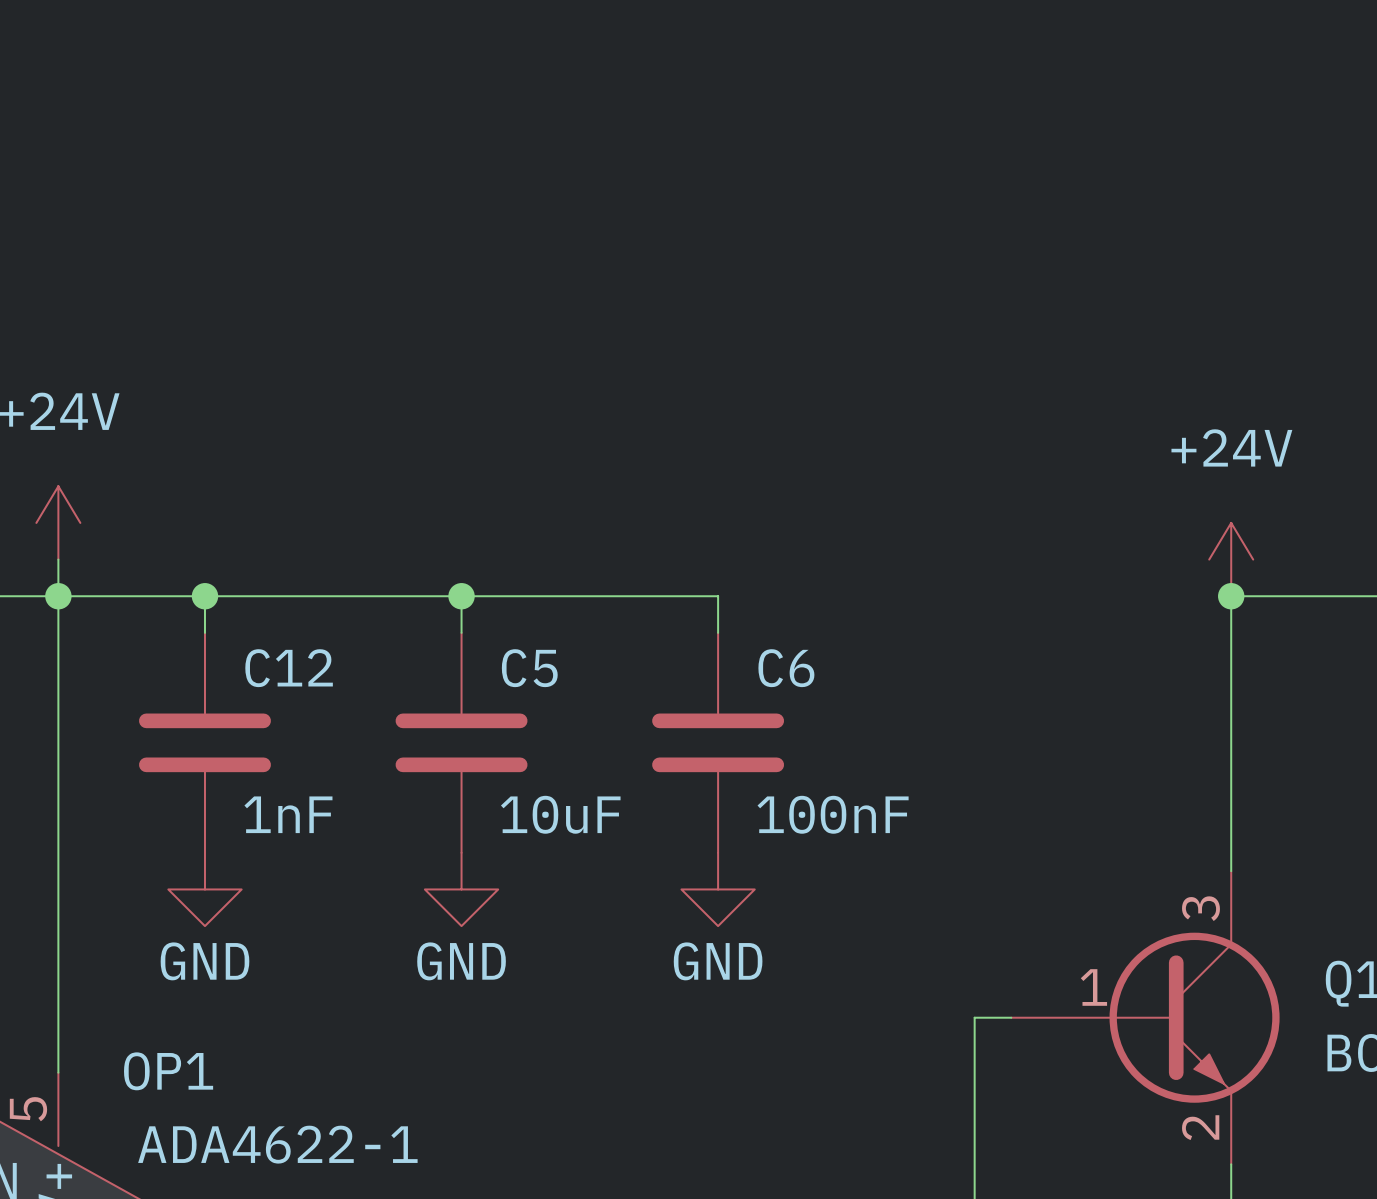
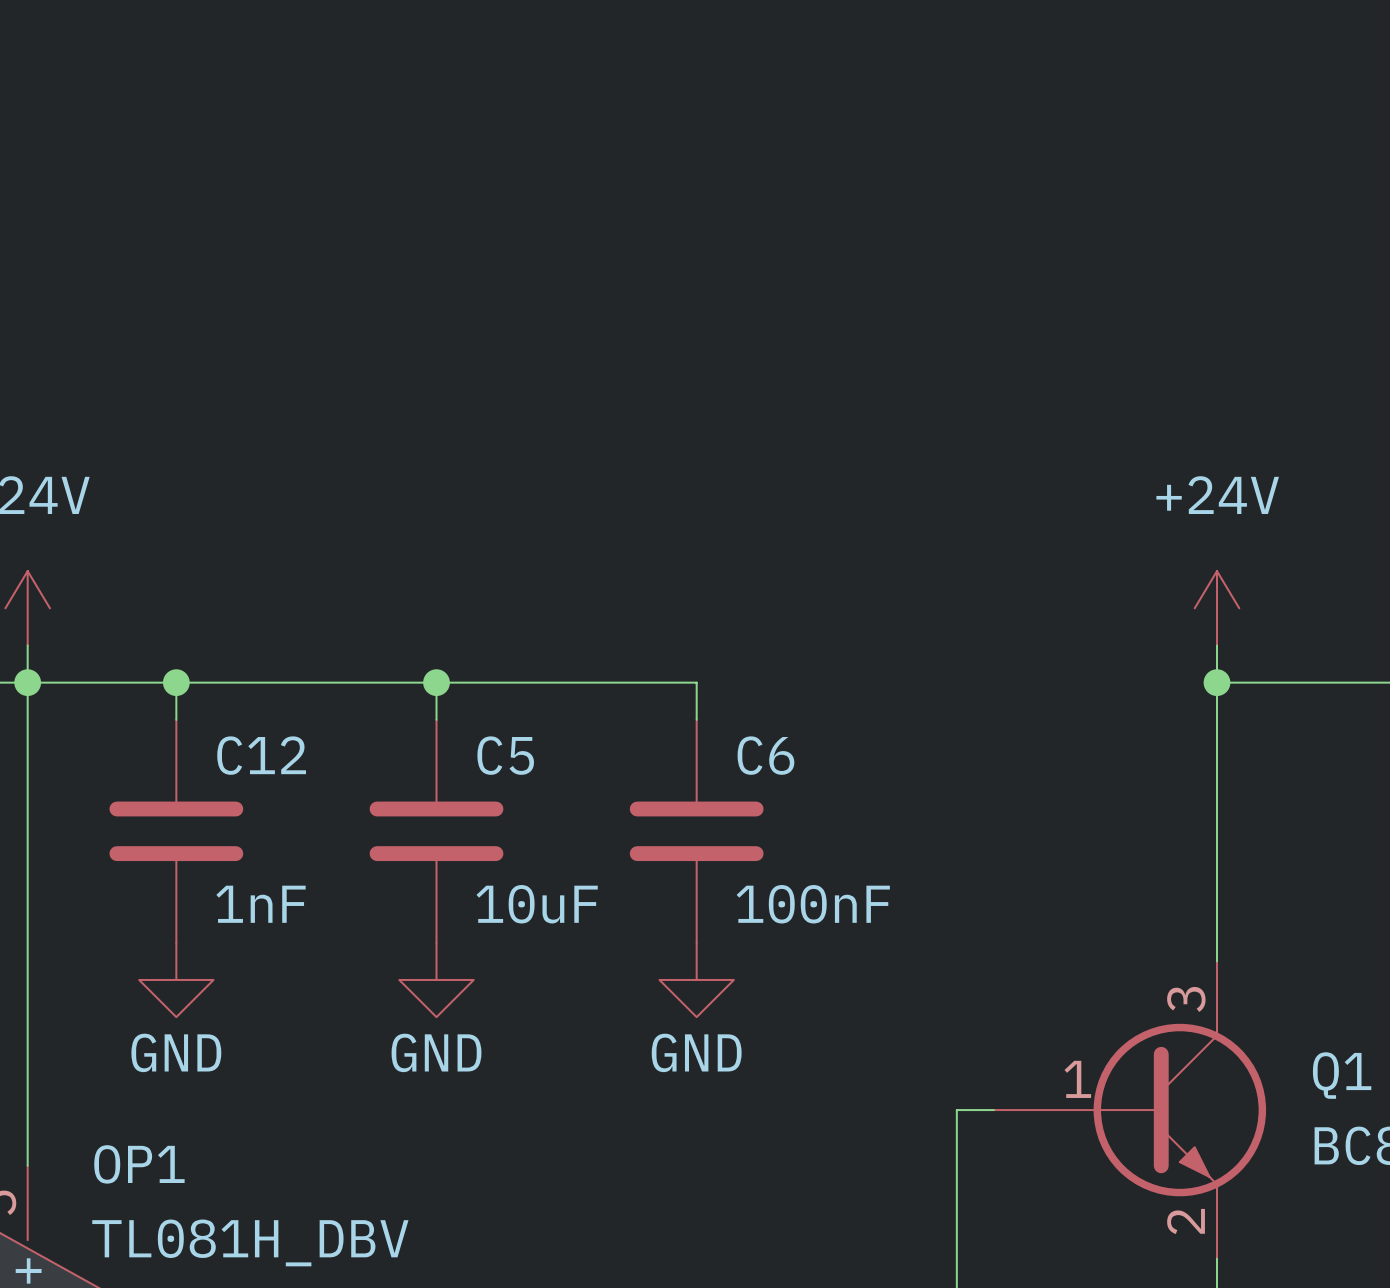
power symbol position: +24V (1231, 559) -> +24V (1217, 608)
OP1 value: ADA4622-1 (277, 1144) -> TL081H_DBV (250, 1242)

